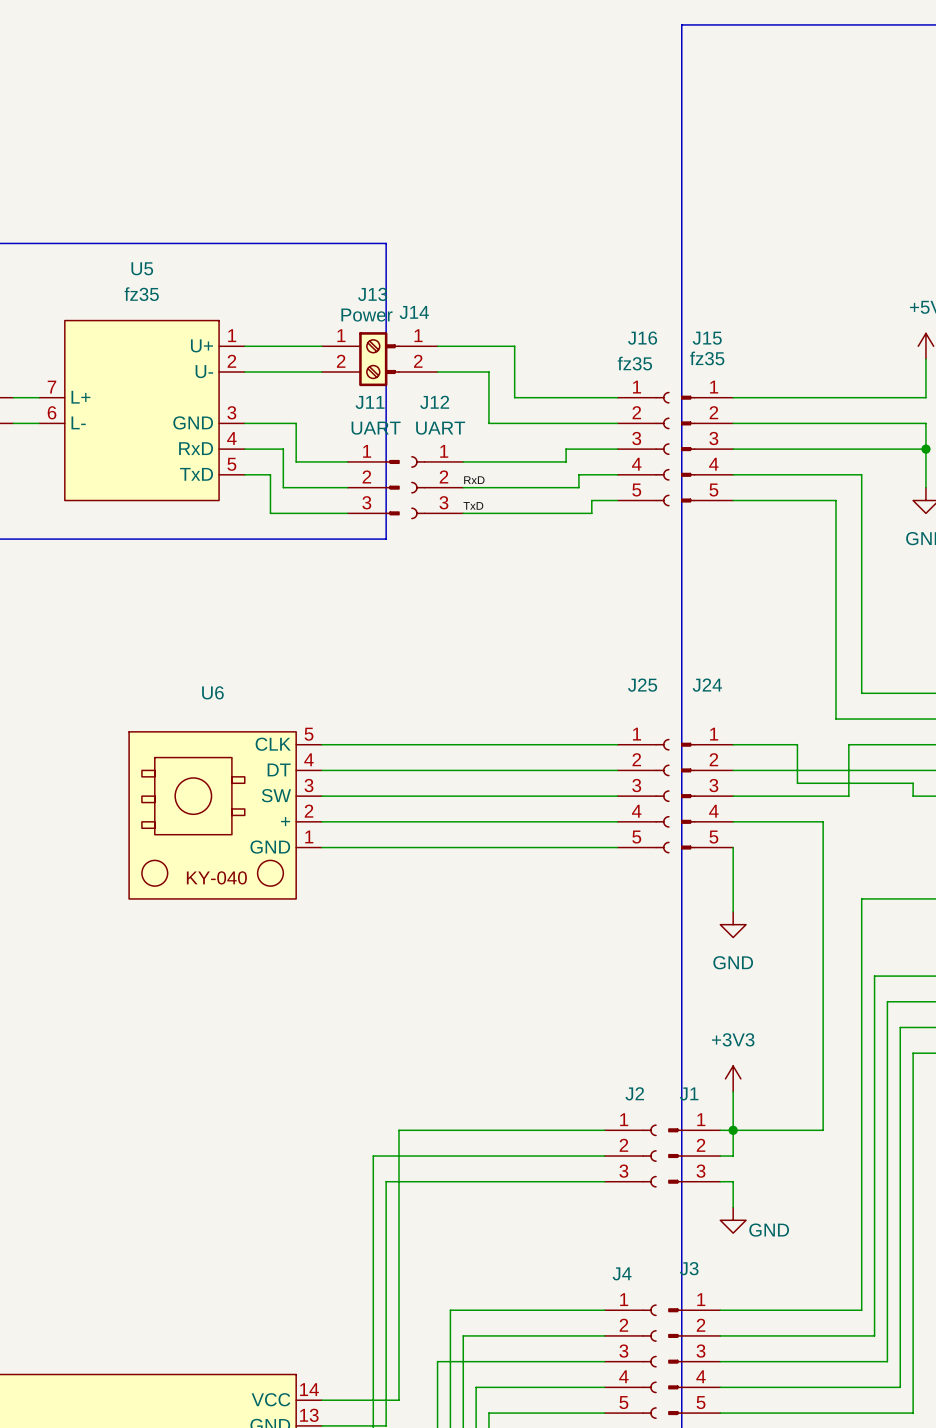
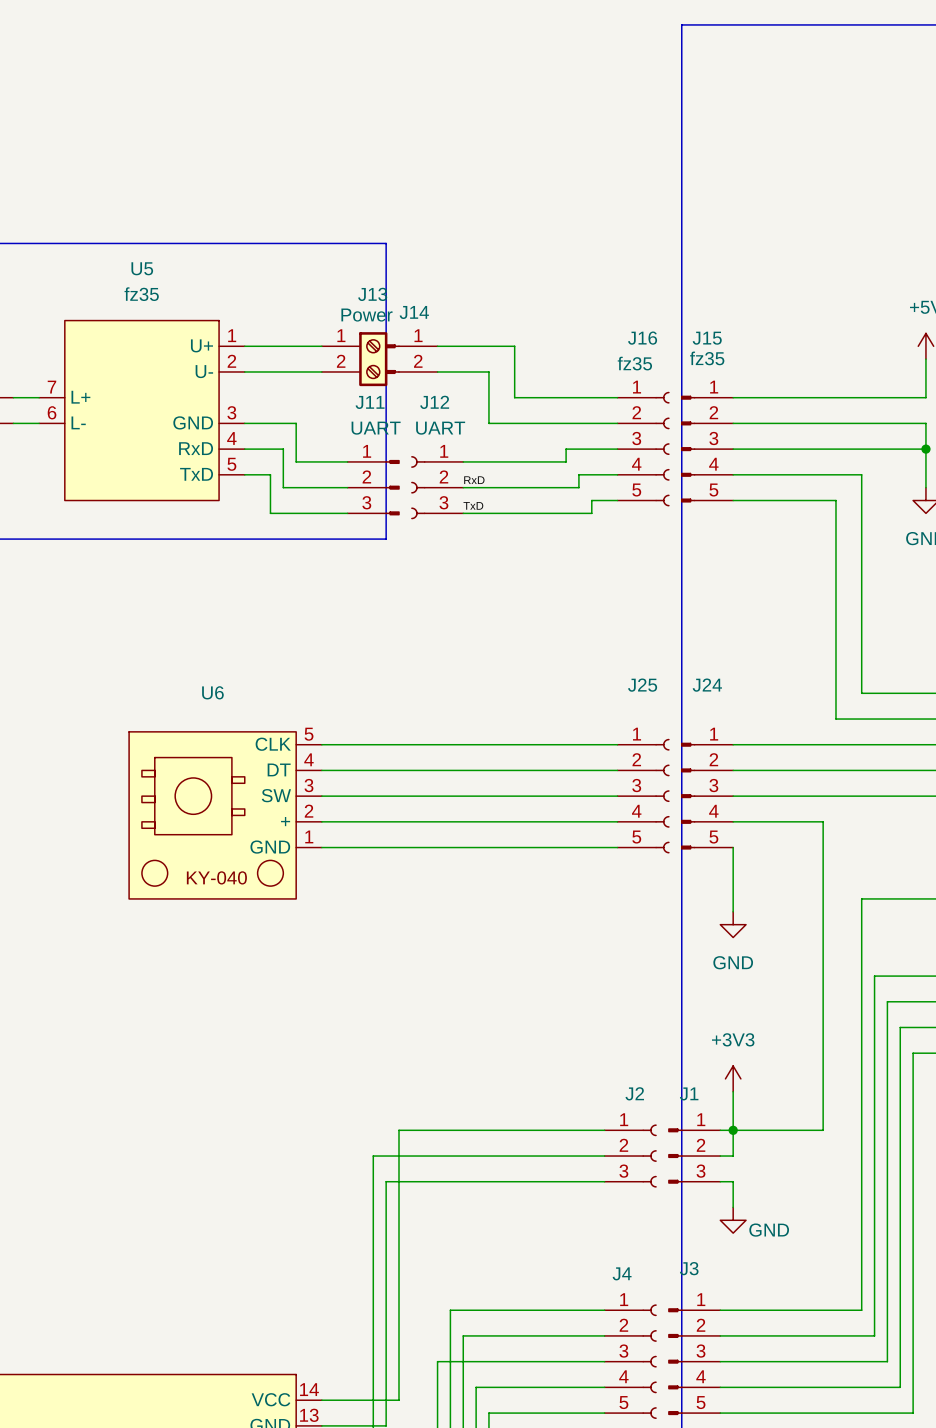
wire: (797, 744) (797, 783) (913, 783) (913, 796) -> (848, 796) (913, 796)
wire: (848, 744) (848, 796) -> (848, 744) (797, 744)

